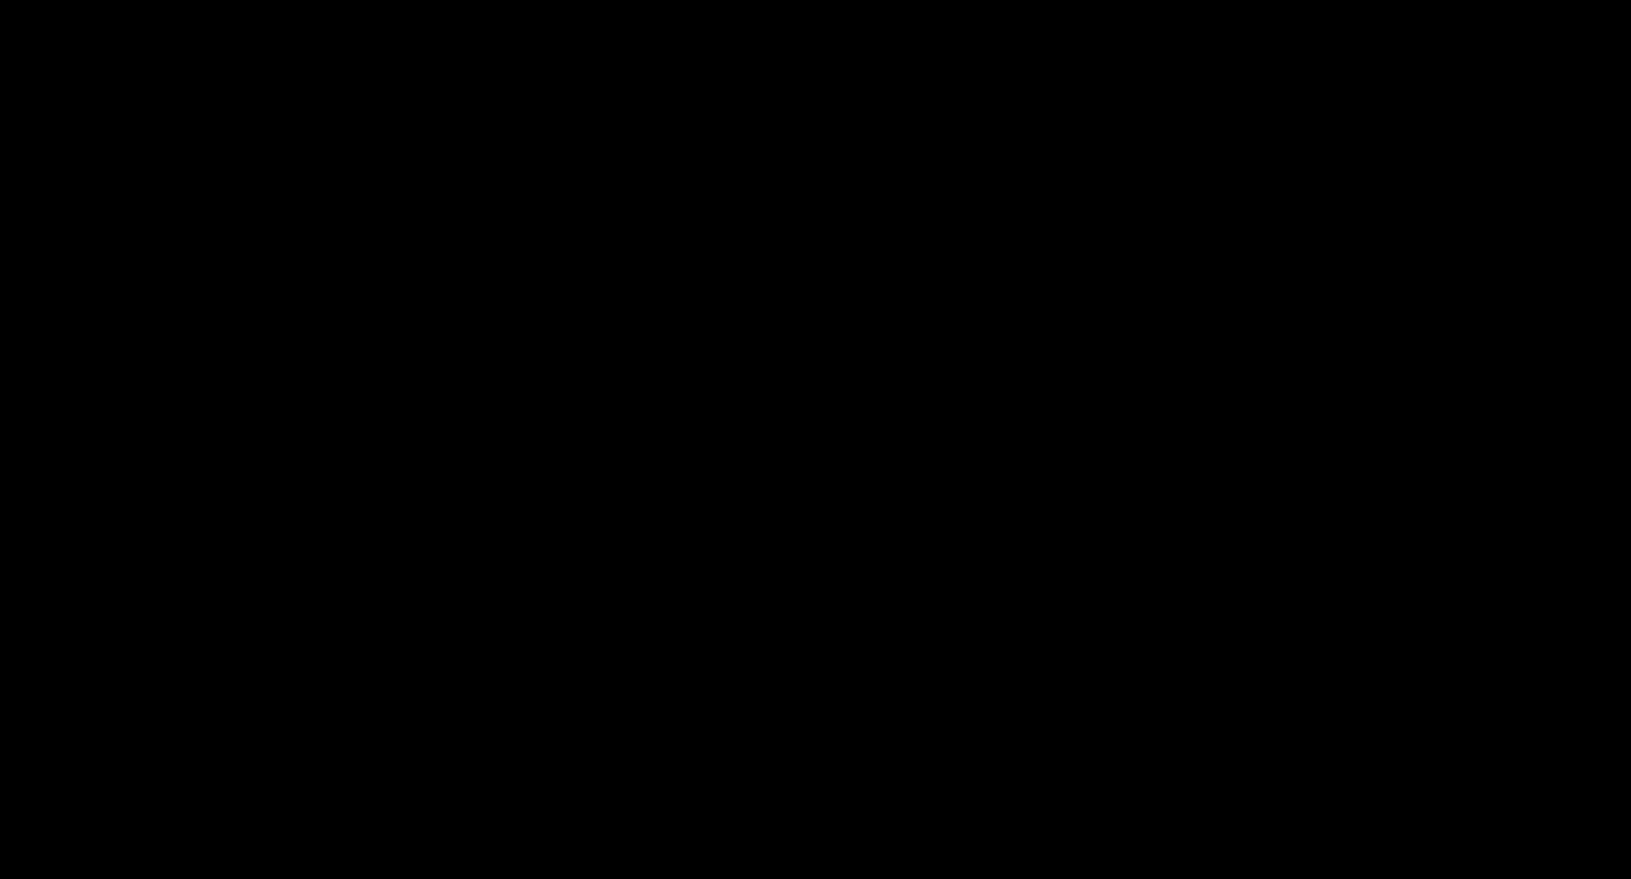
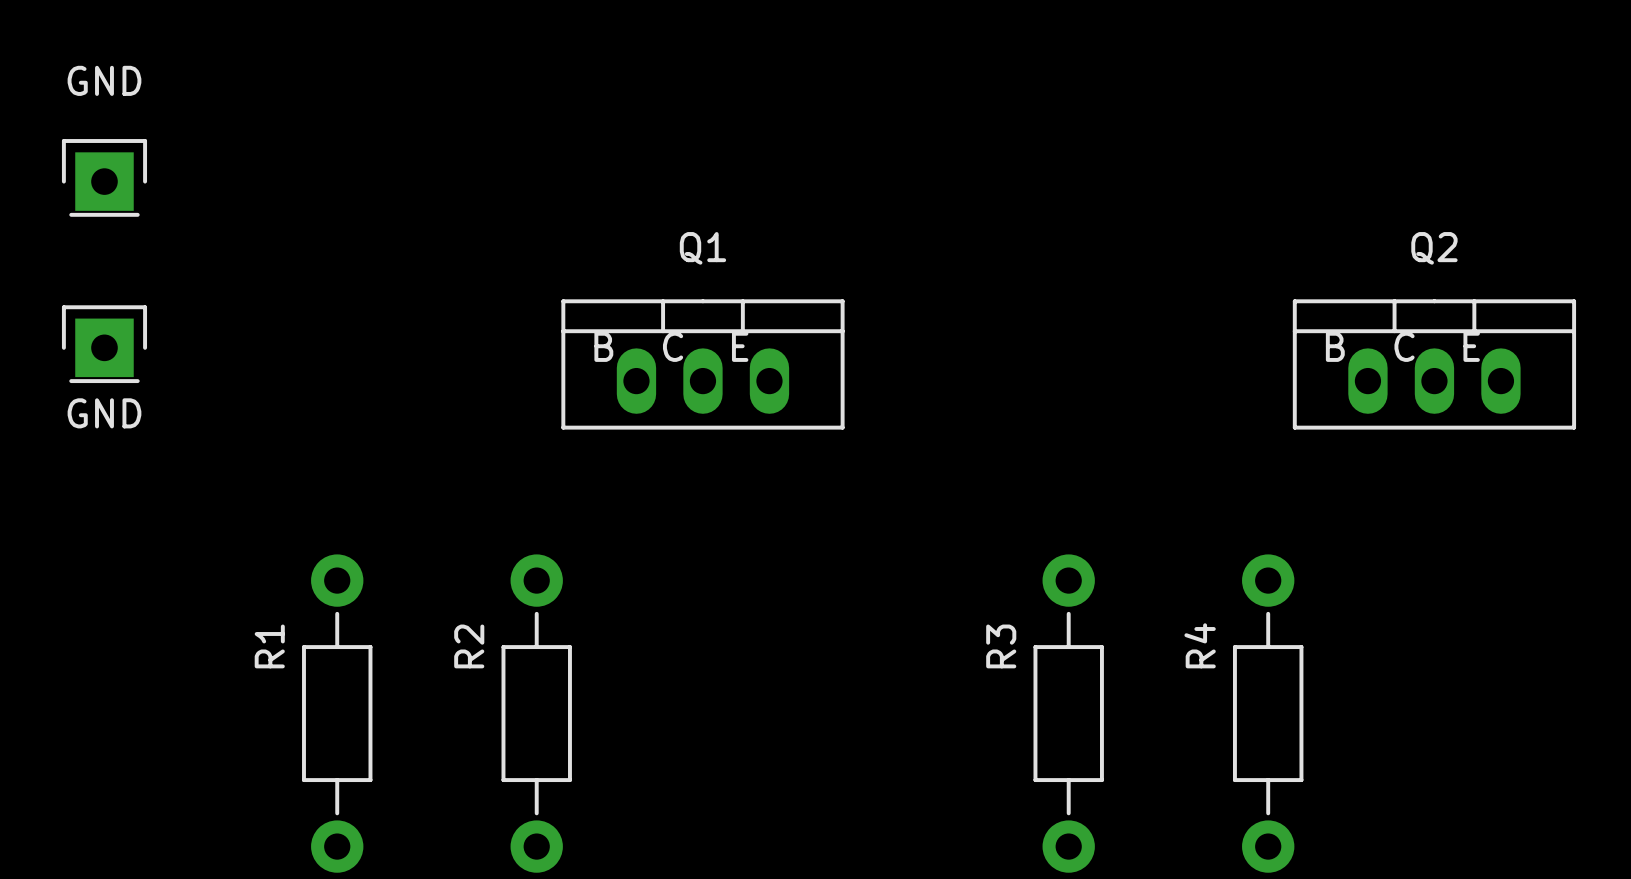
GND: none -> (104, 177)
GND: none -> (104, 344)
Q1: none -> (702, 364)
Q2: none -> (1434, 364)
R1: none -> (337, 713)
R2: none -> (536, 713)
R3: none -> (1068, 713)
R4: none -> (1268, 713)

